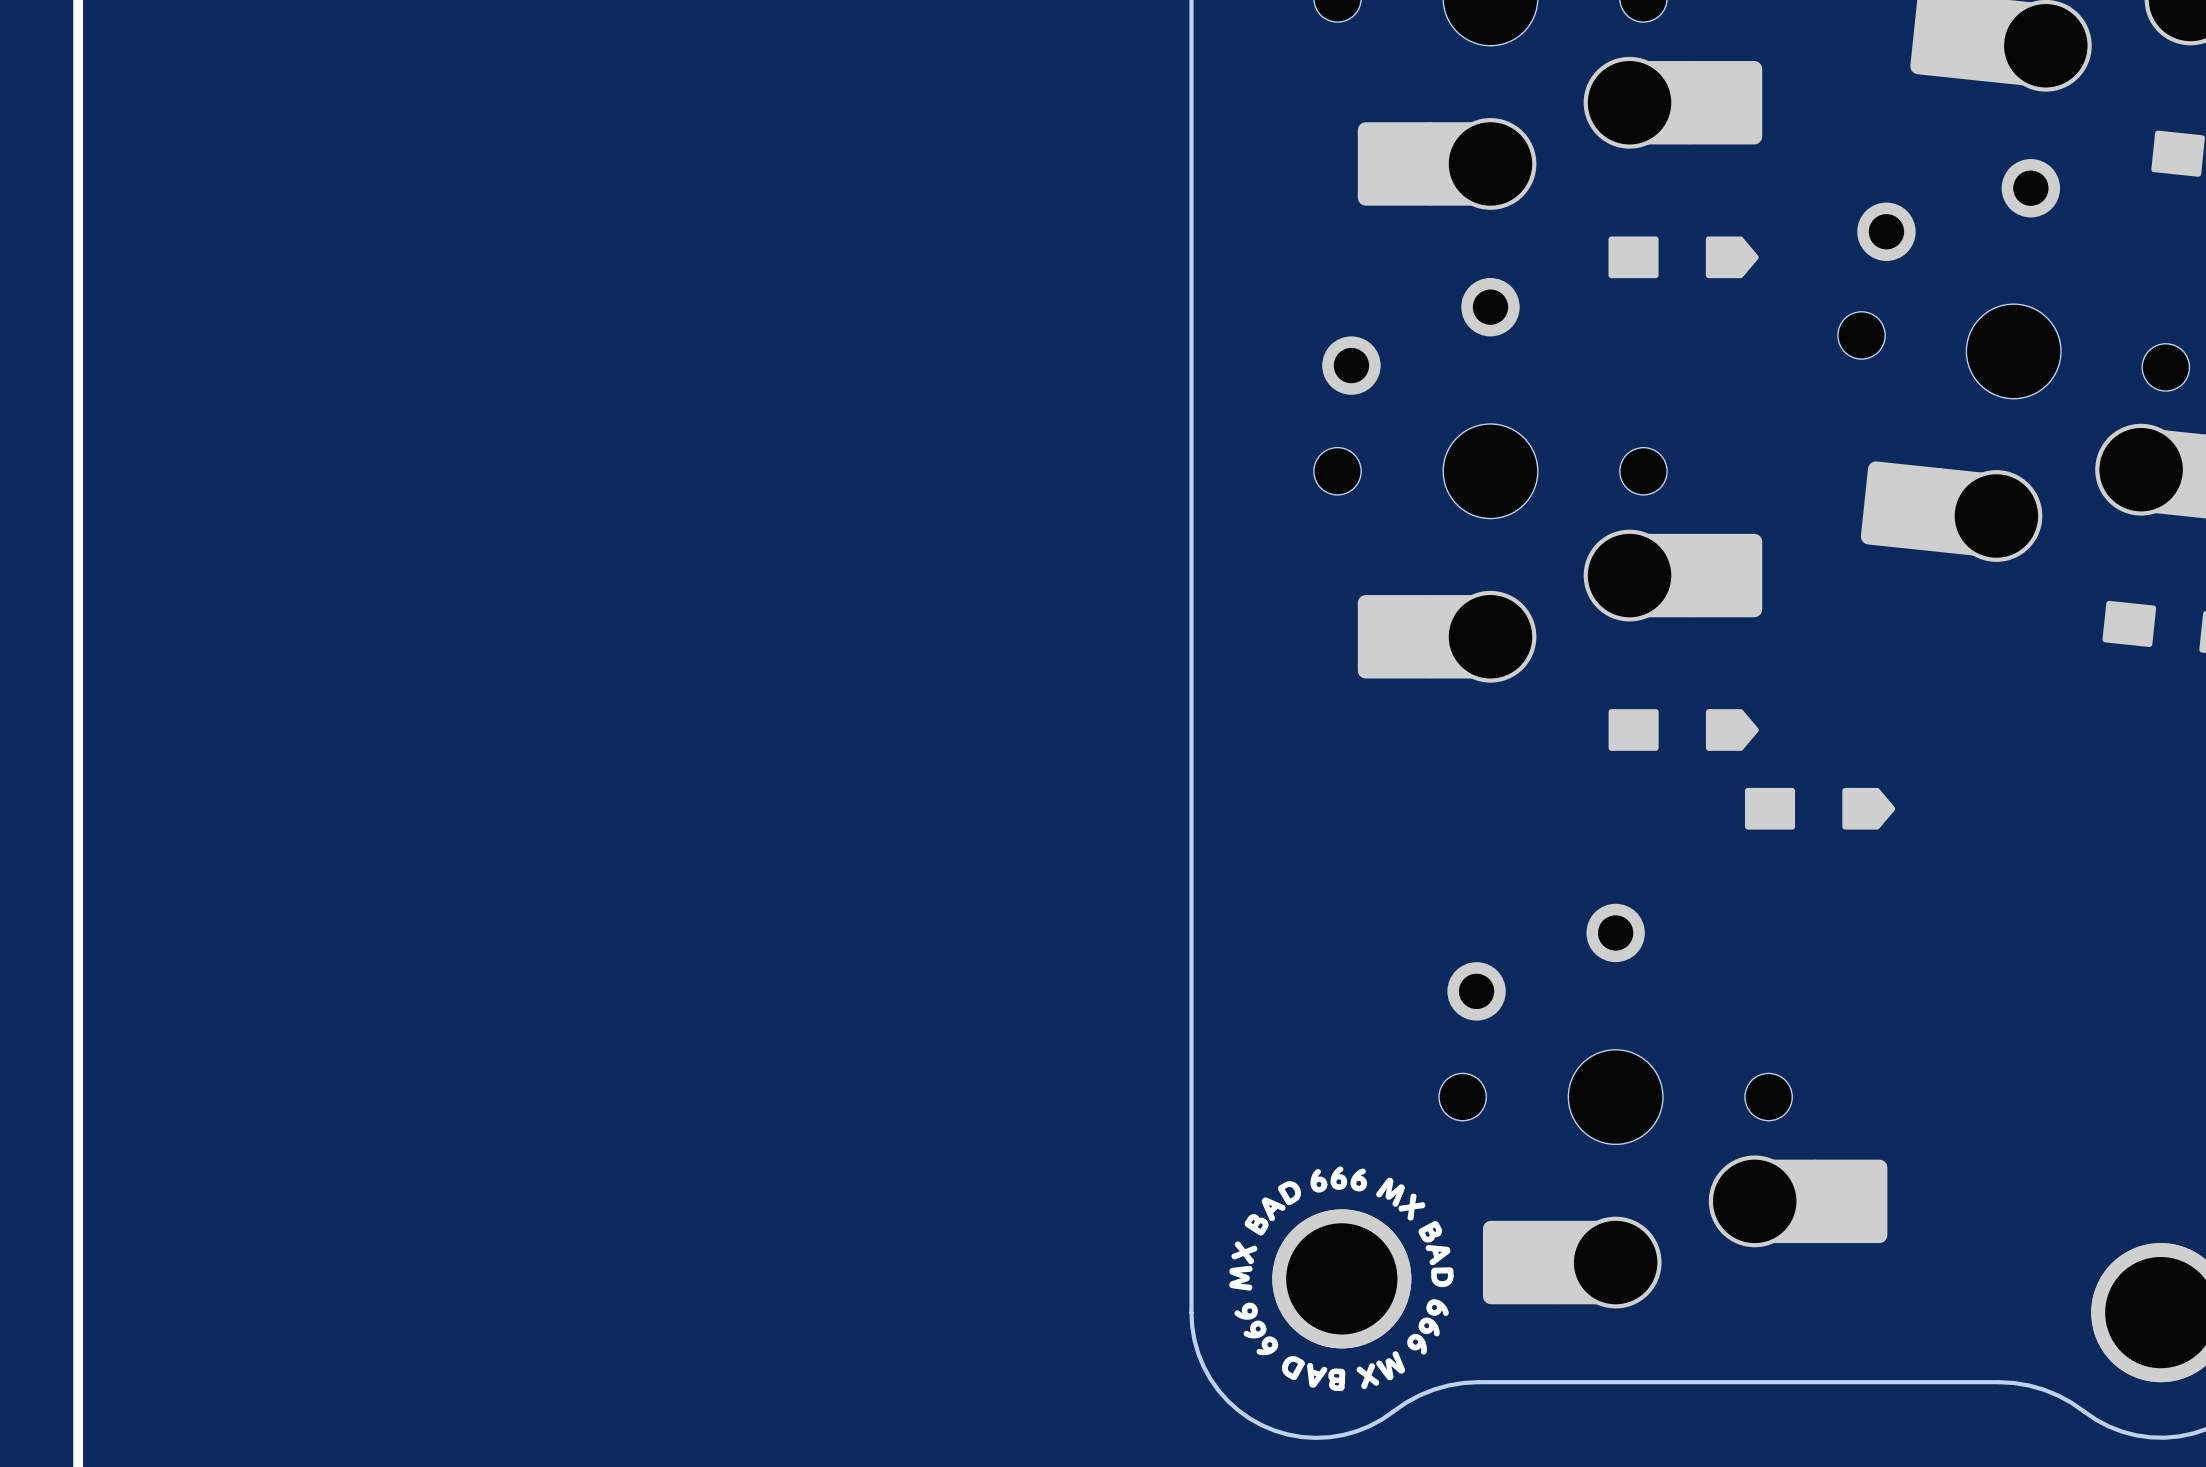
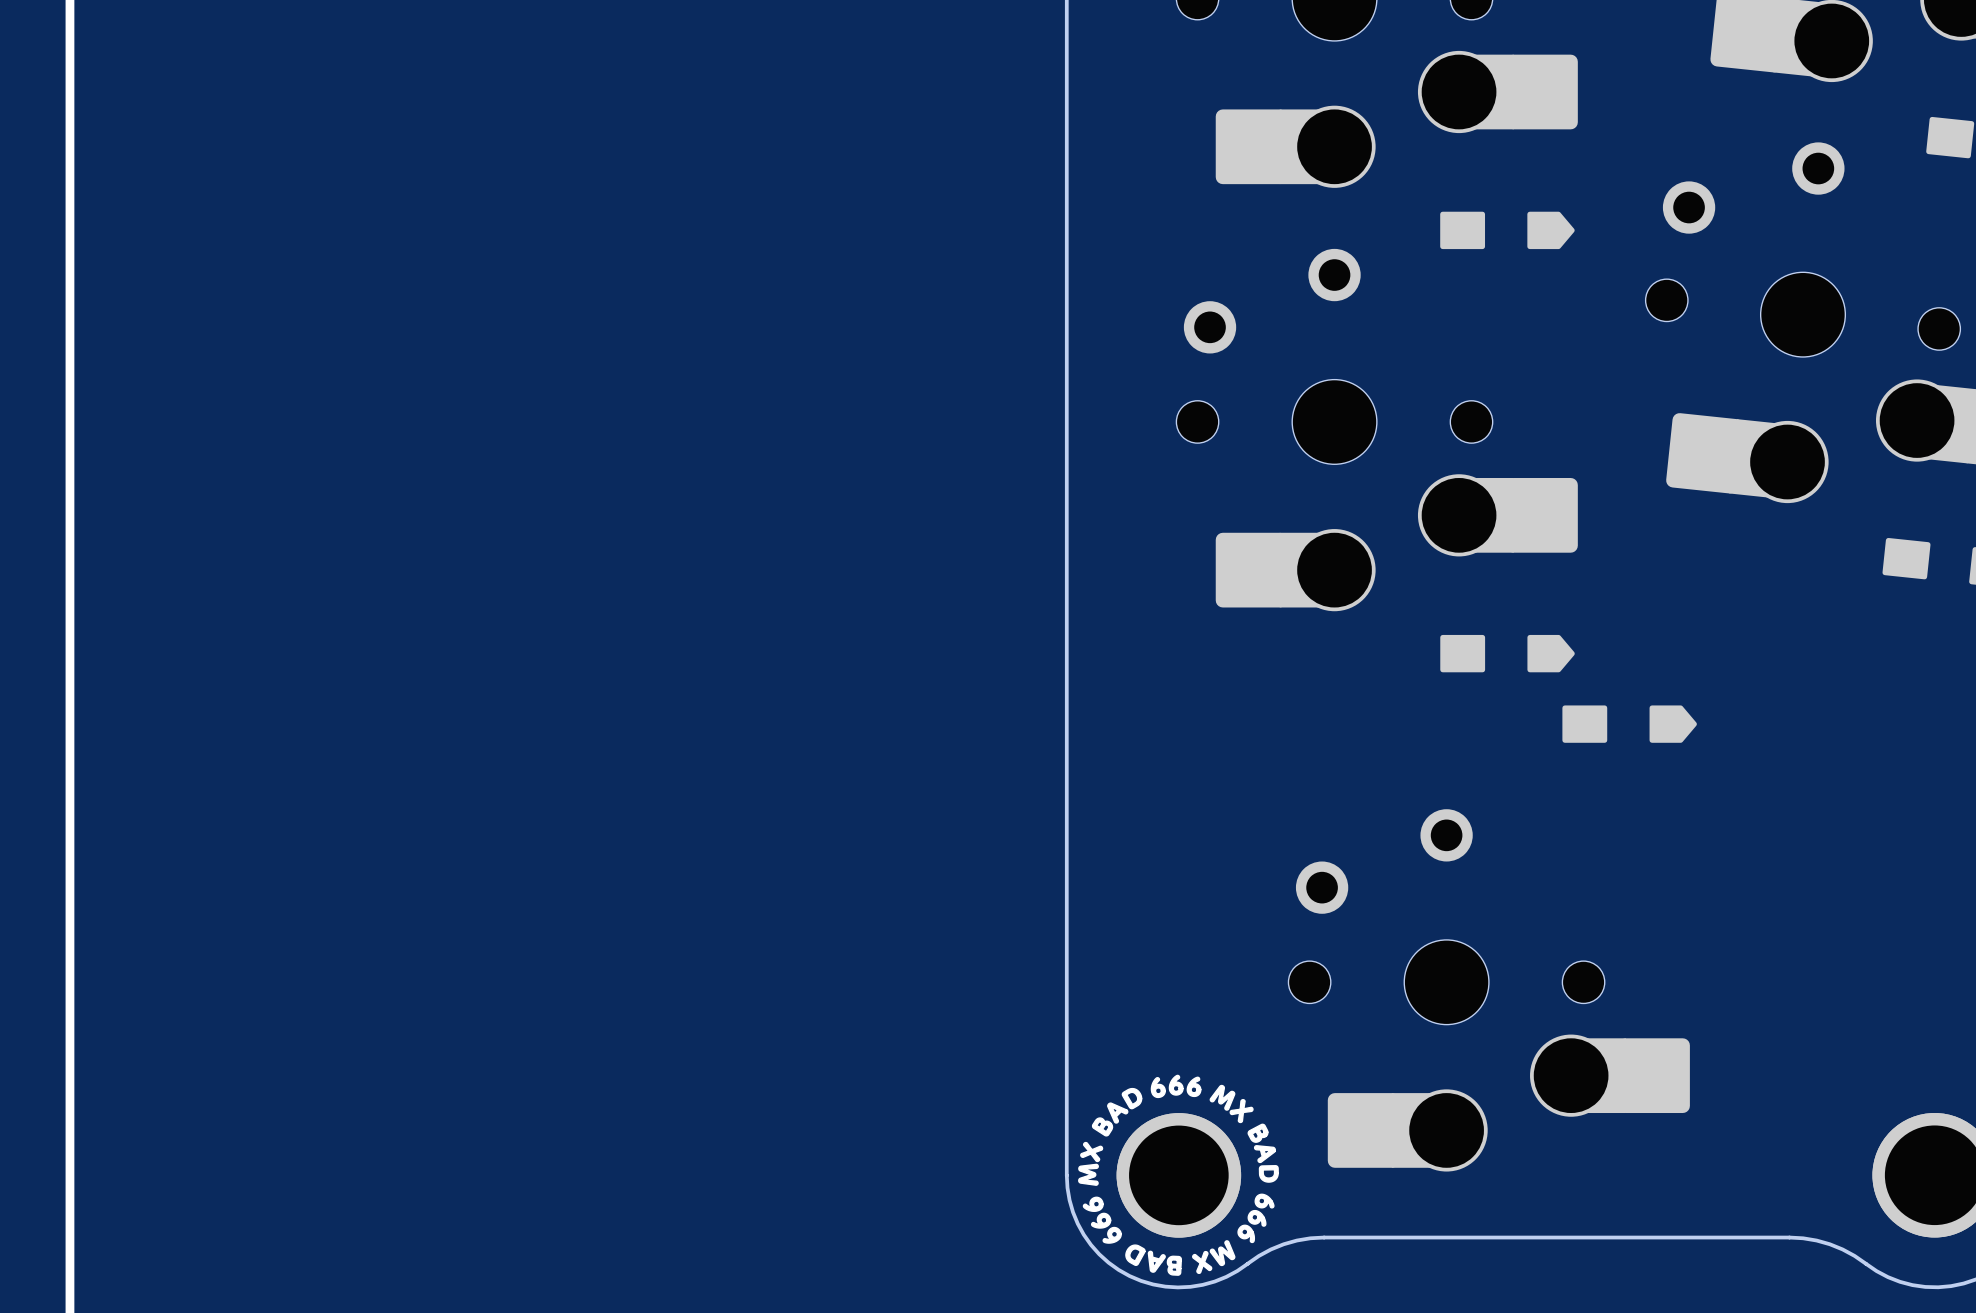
part position: (1341, 1278) -> (1178, 1175)

